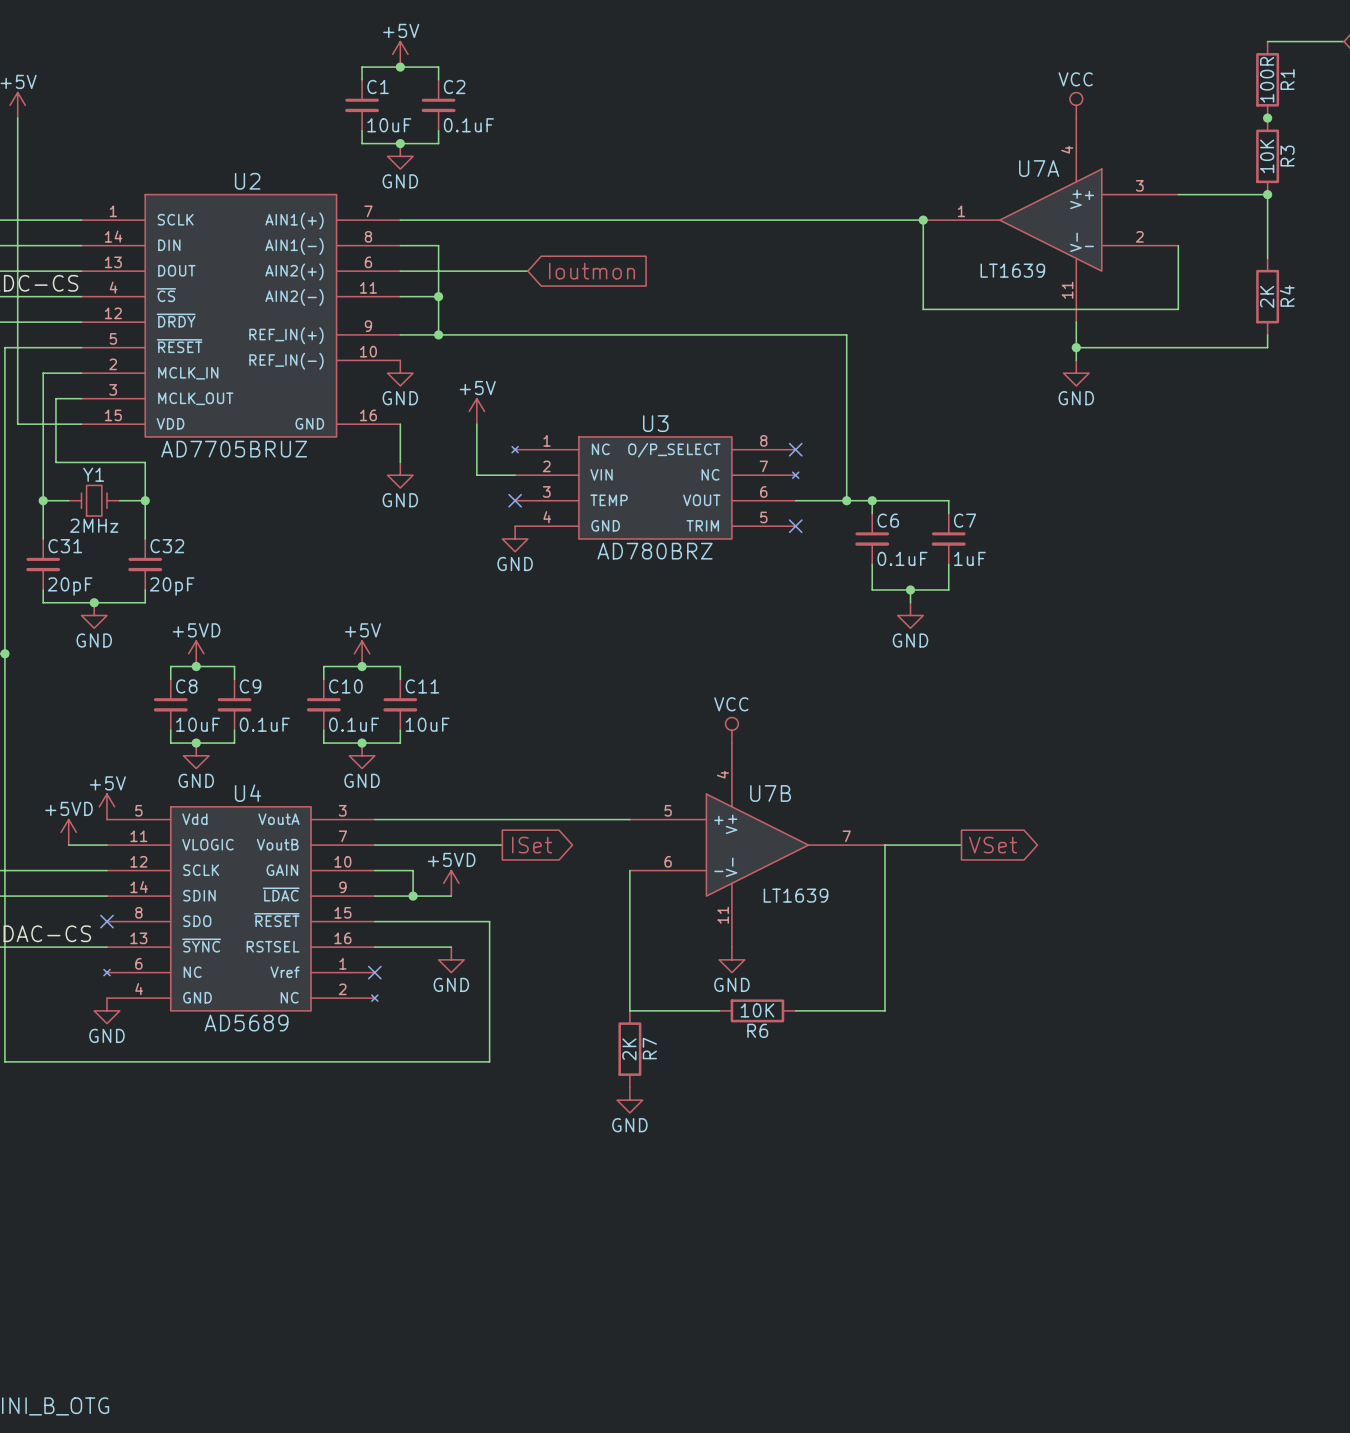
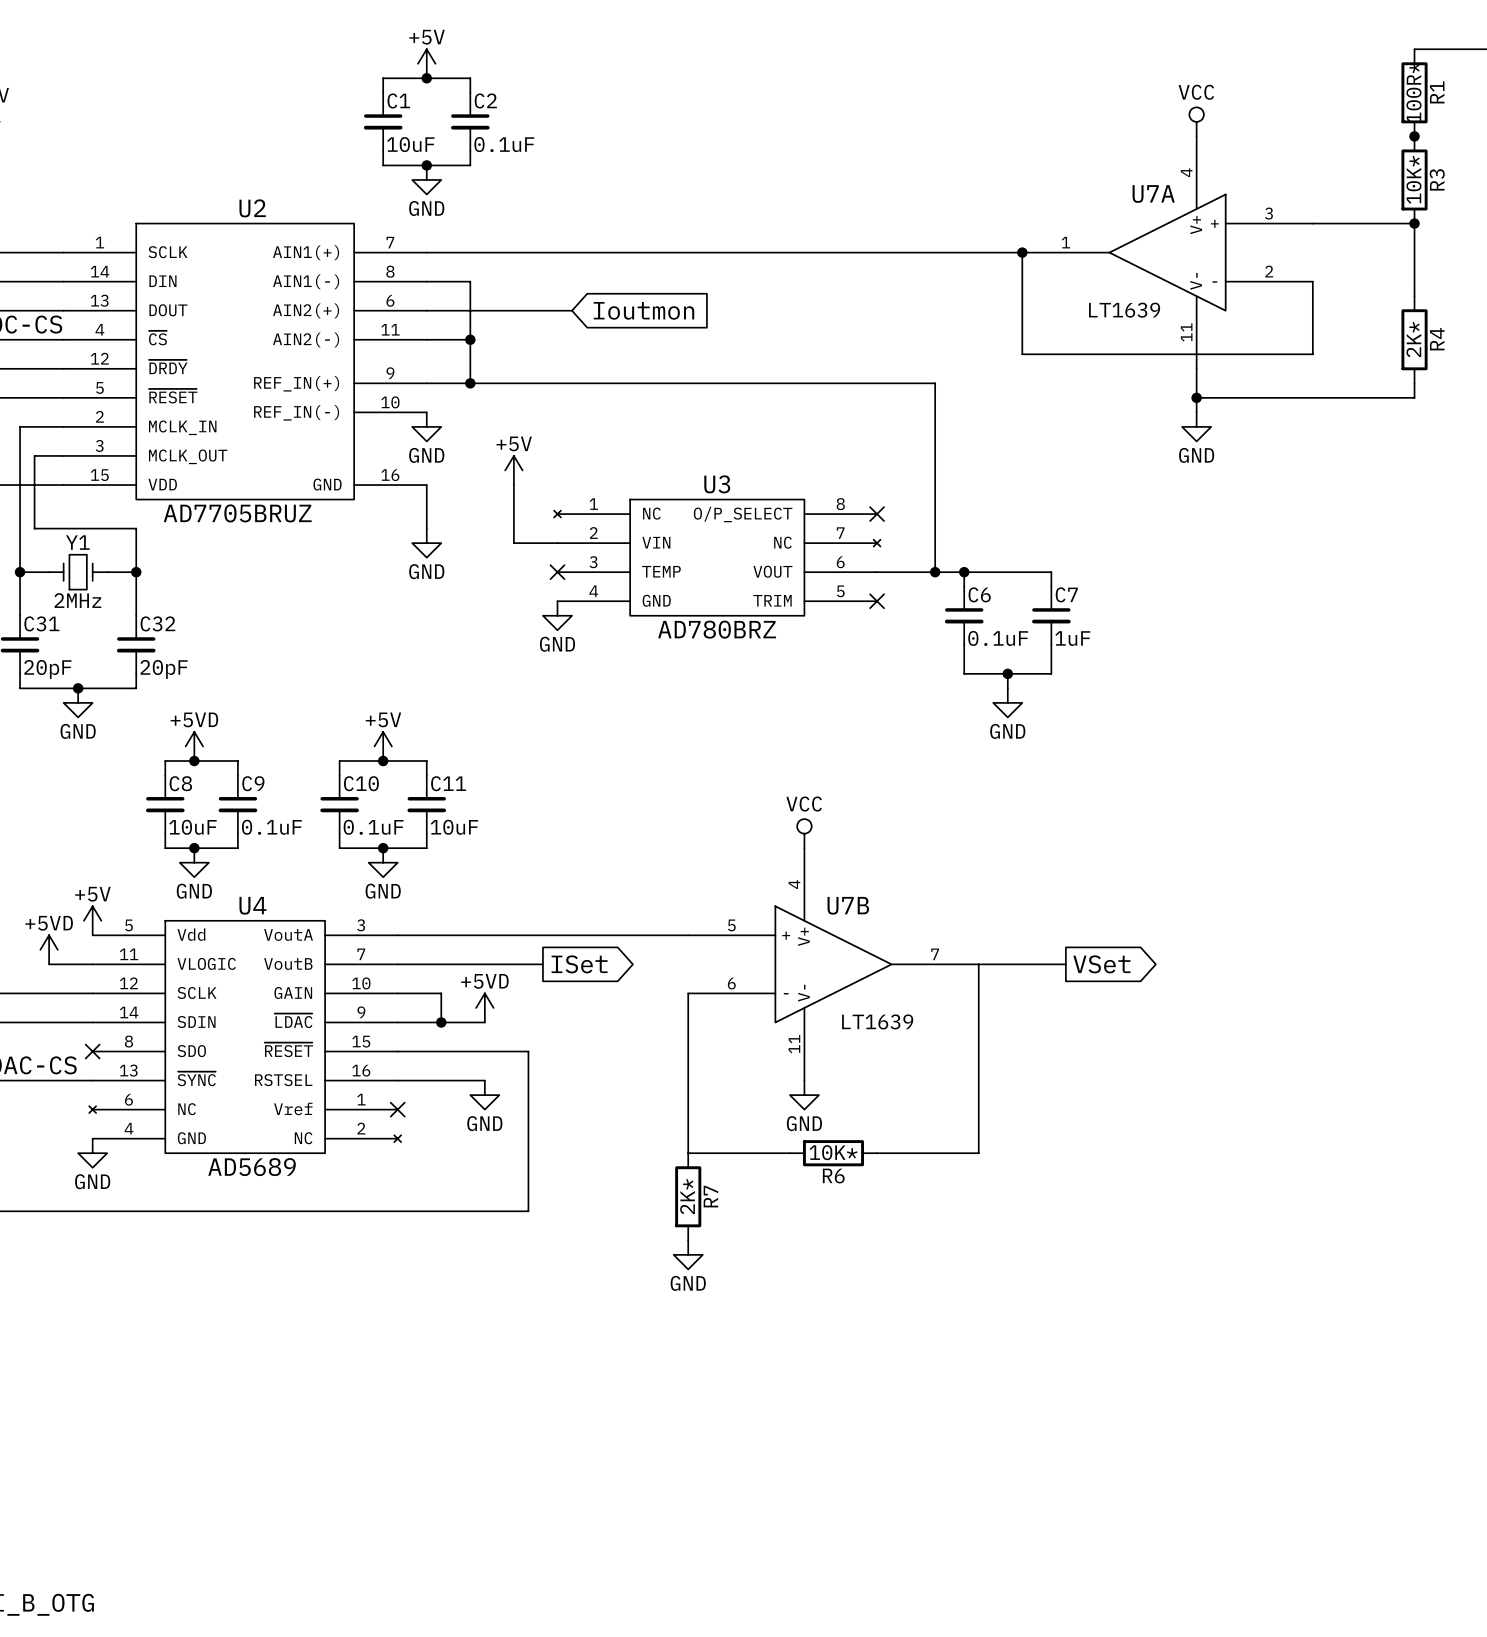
R1 value: 100R (1267, 79) -> 100R* (1413, 92)
R3 value: 10K (1267, 156) -> 10K* (1413, 179)
R4 value: 2K (1267, 296) -> 2K* (1413, 339)
R6 value: 10K (757, 1010) -> 10K* (833, 1152)
R7 value: 2K (629, 1049) -> 2K* (687, 1196)

